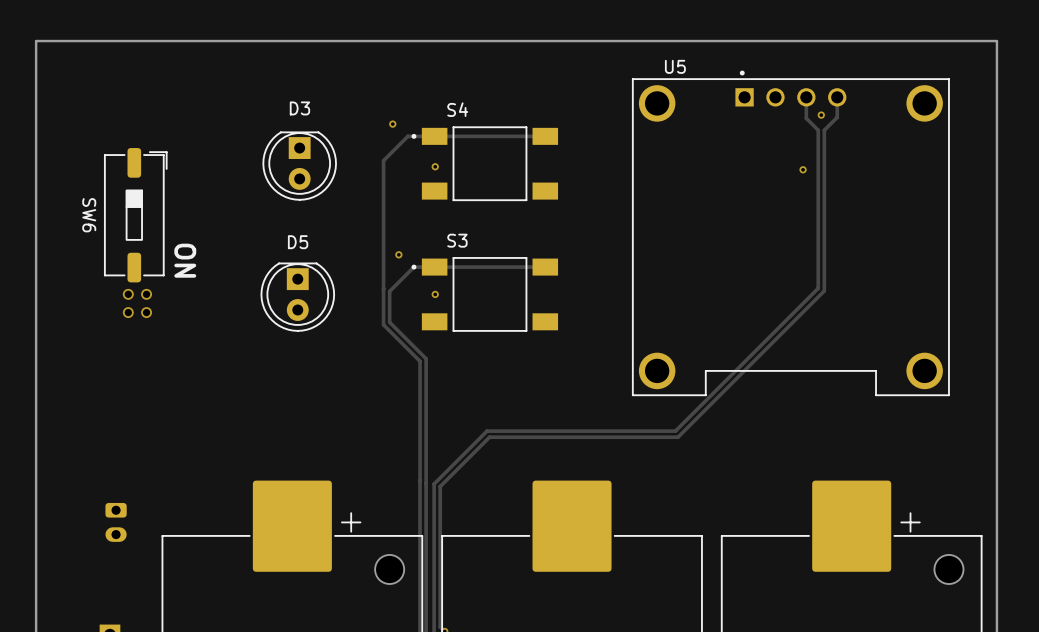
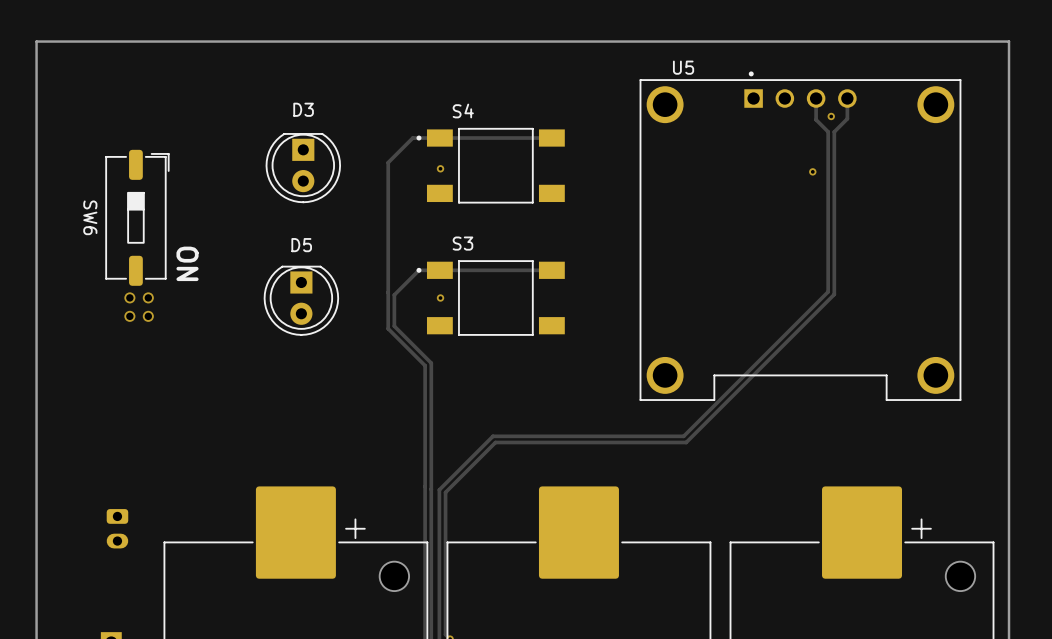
via: (392, 124) -> none
via: (398, 254) -> none

